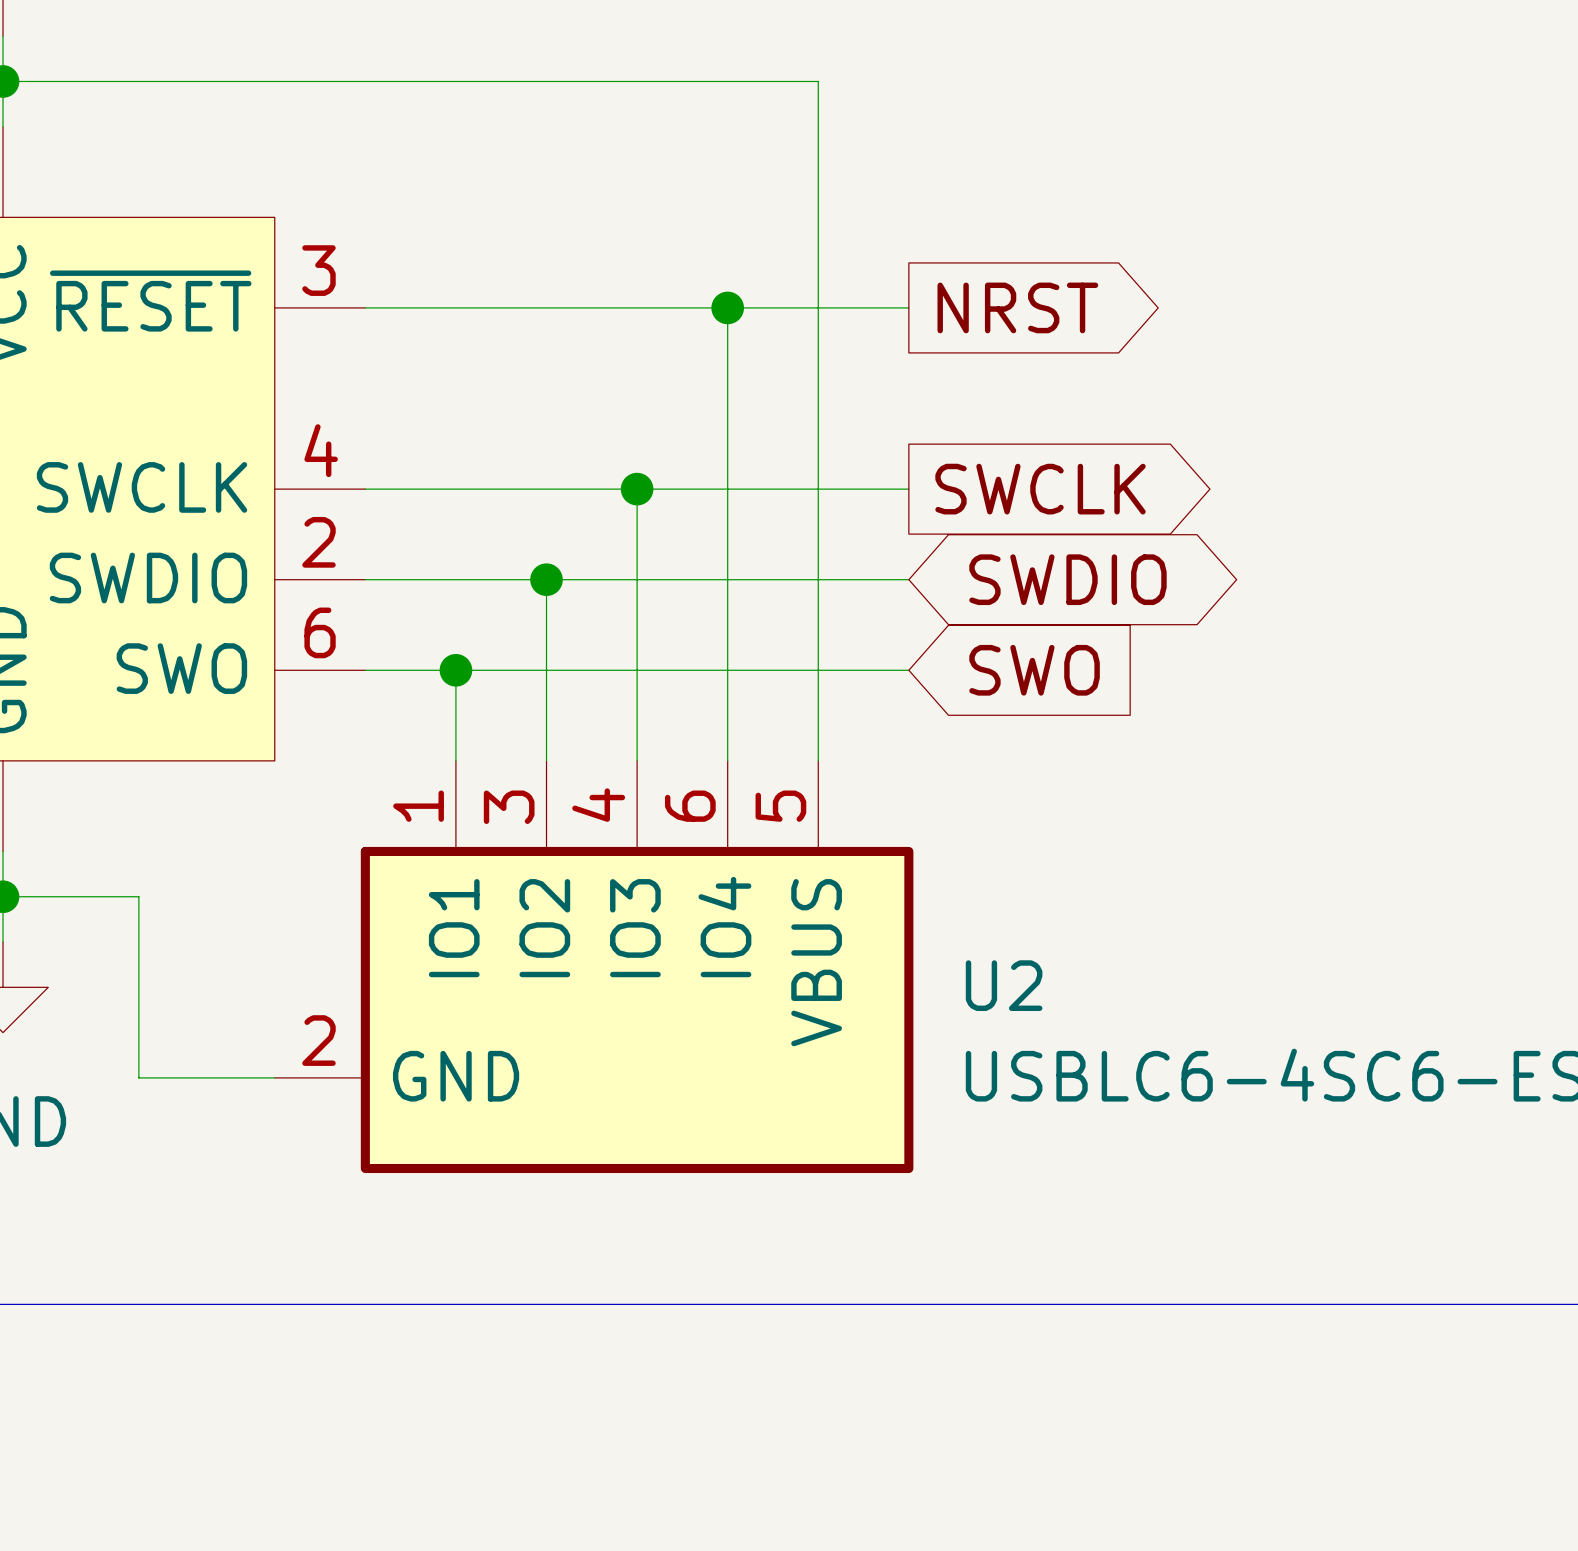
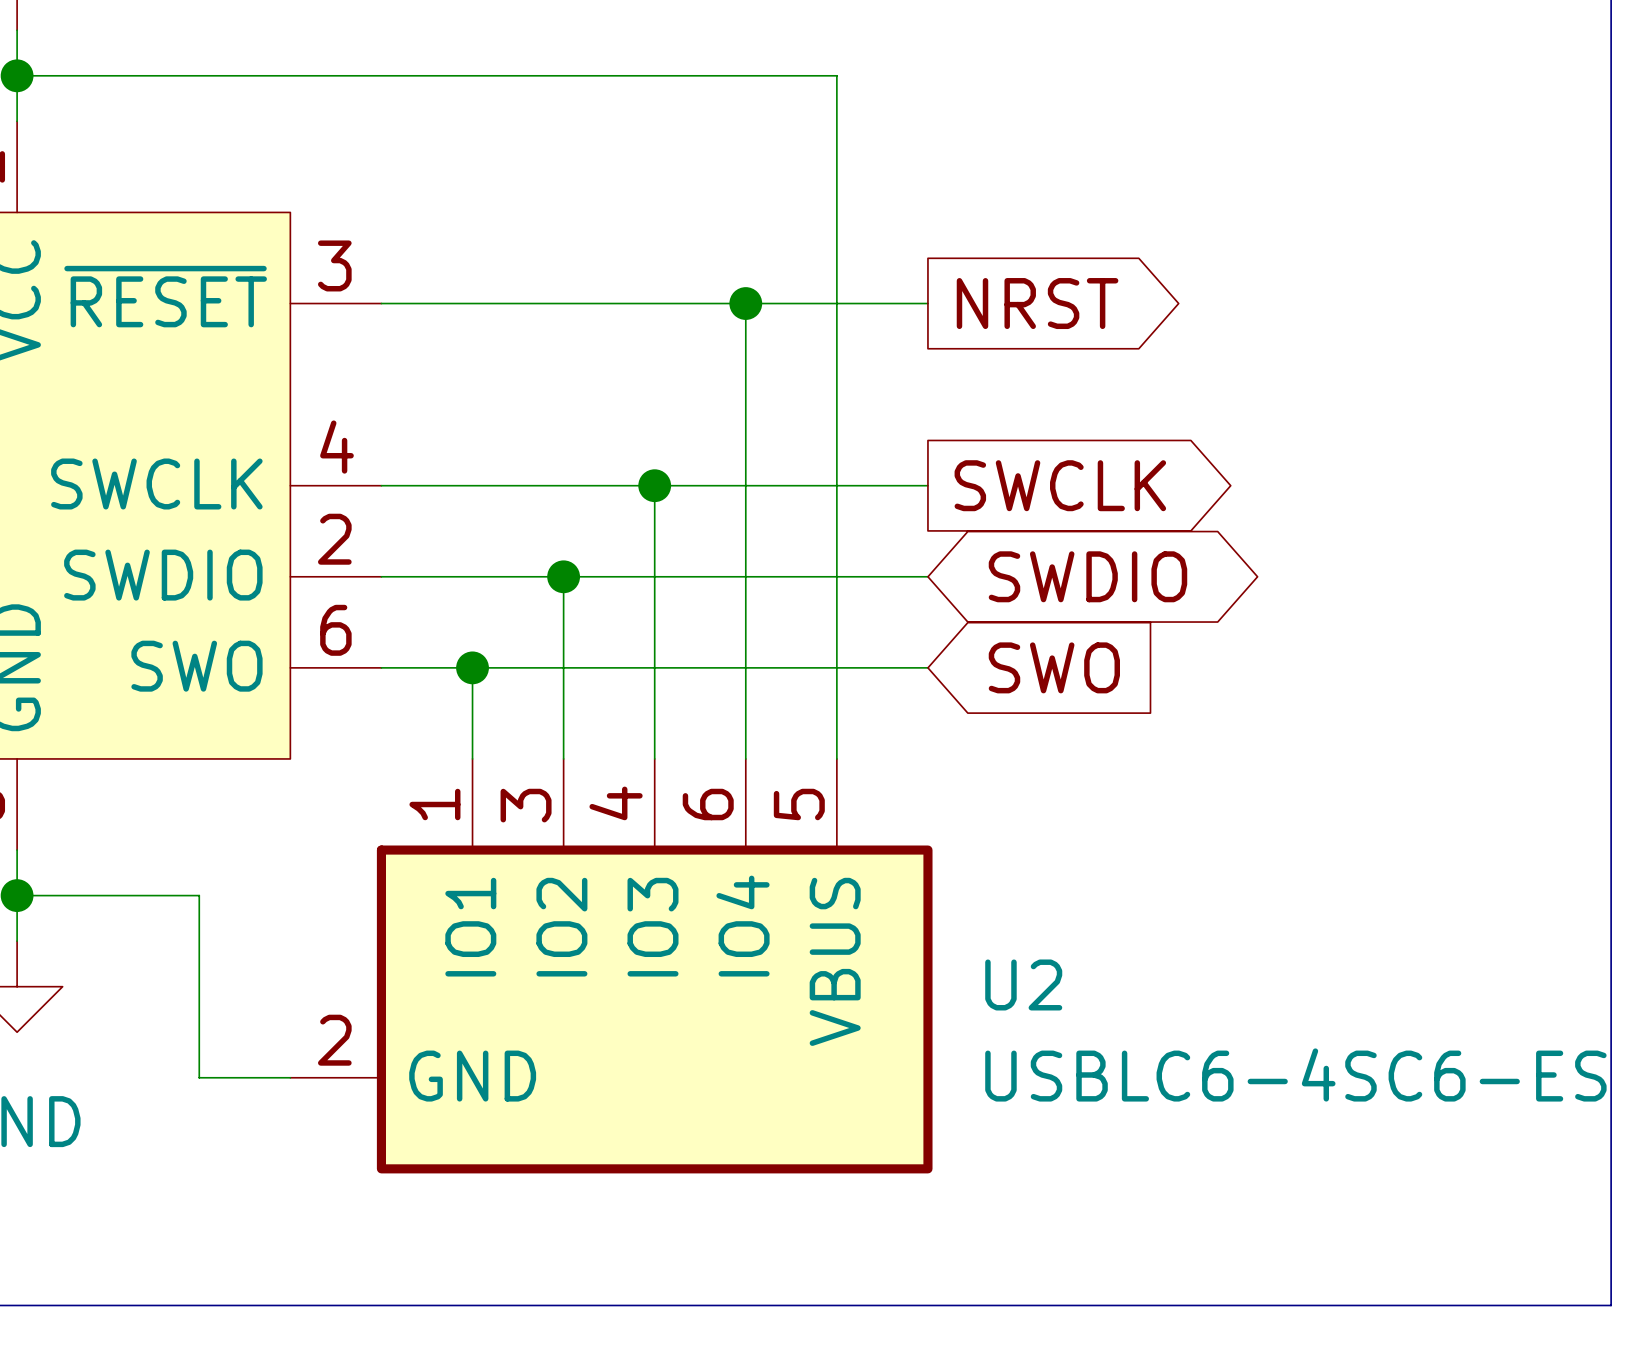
wire: (138, 896) (138, 1077) (184, 1077) -> (153, 895) (199, 895) (199, 1077)

